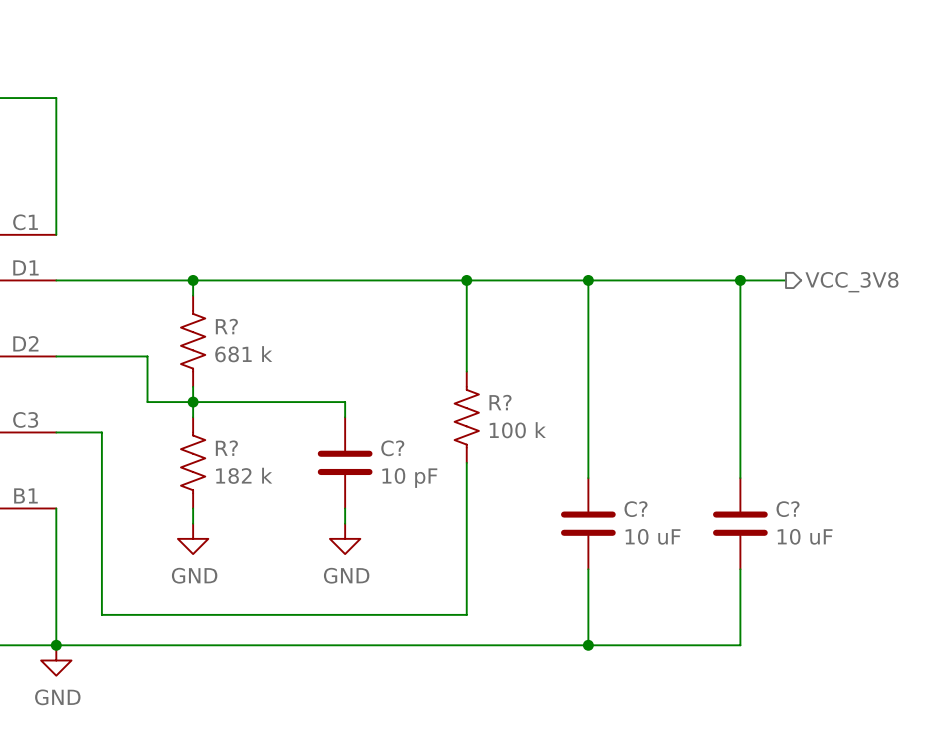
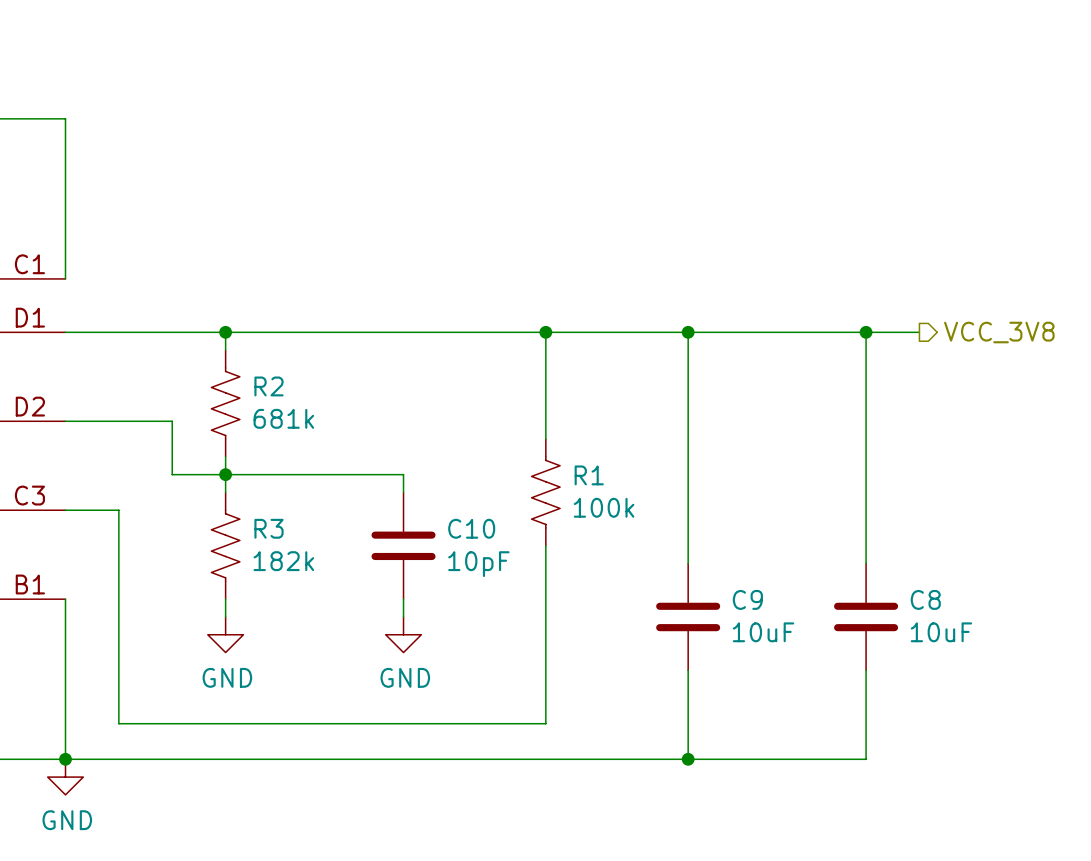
R? name: R? (226, 326) -> R2 (269, 386)
R? value: 681 k (243, 354) -> 681k (283, 418)
R? name: R? (500, 402) -> R1 (589, 475)
R? value: 100 k (517, 430) -> 100k (604, 507)
R? name: R? (226, 448) -> R3 (269, 528)
C? name: C? (392, 448) -> C10 (471, 528)
R? value: 182 k (244, 475) -> 182k (283, 561)
C? value: 10 pF (409, 478) -> 10pF (478, 564)
C? name: C? (636, 509) -> C9 (747, 599)
C? name: C? (788, 509) -> C8 (925, 599)
C? value: 10 uF (653, 536) -> 10uF (763, 632)
C? value: 10 uF (805, 536) -> 10uF (941, 632)

